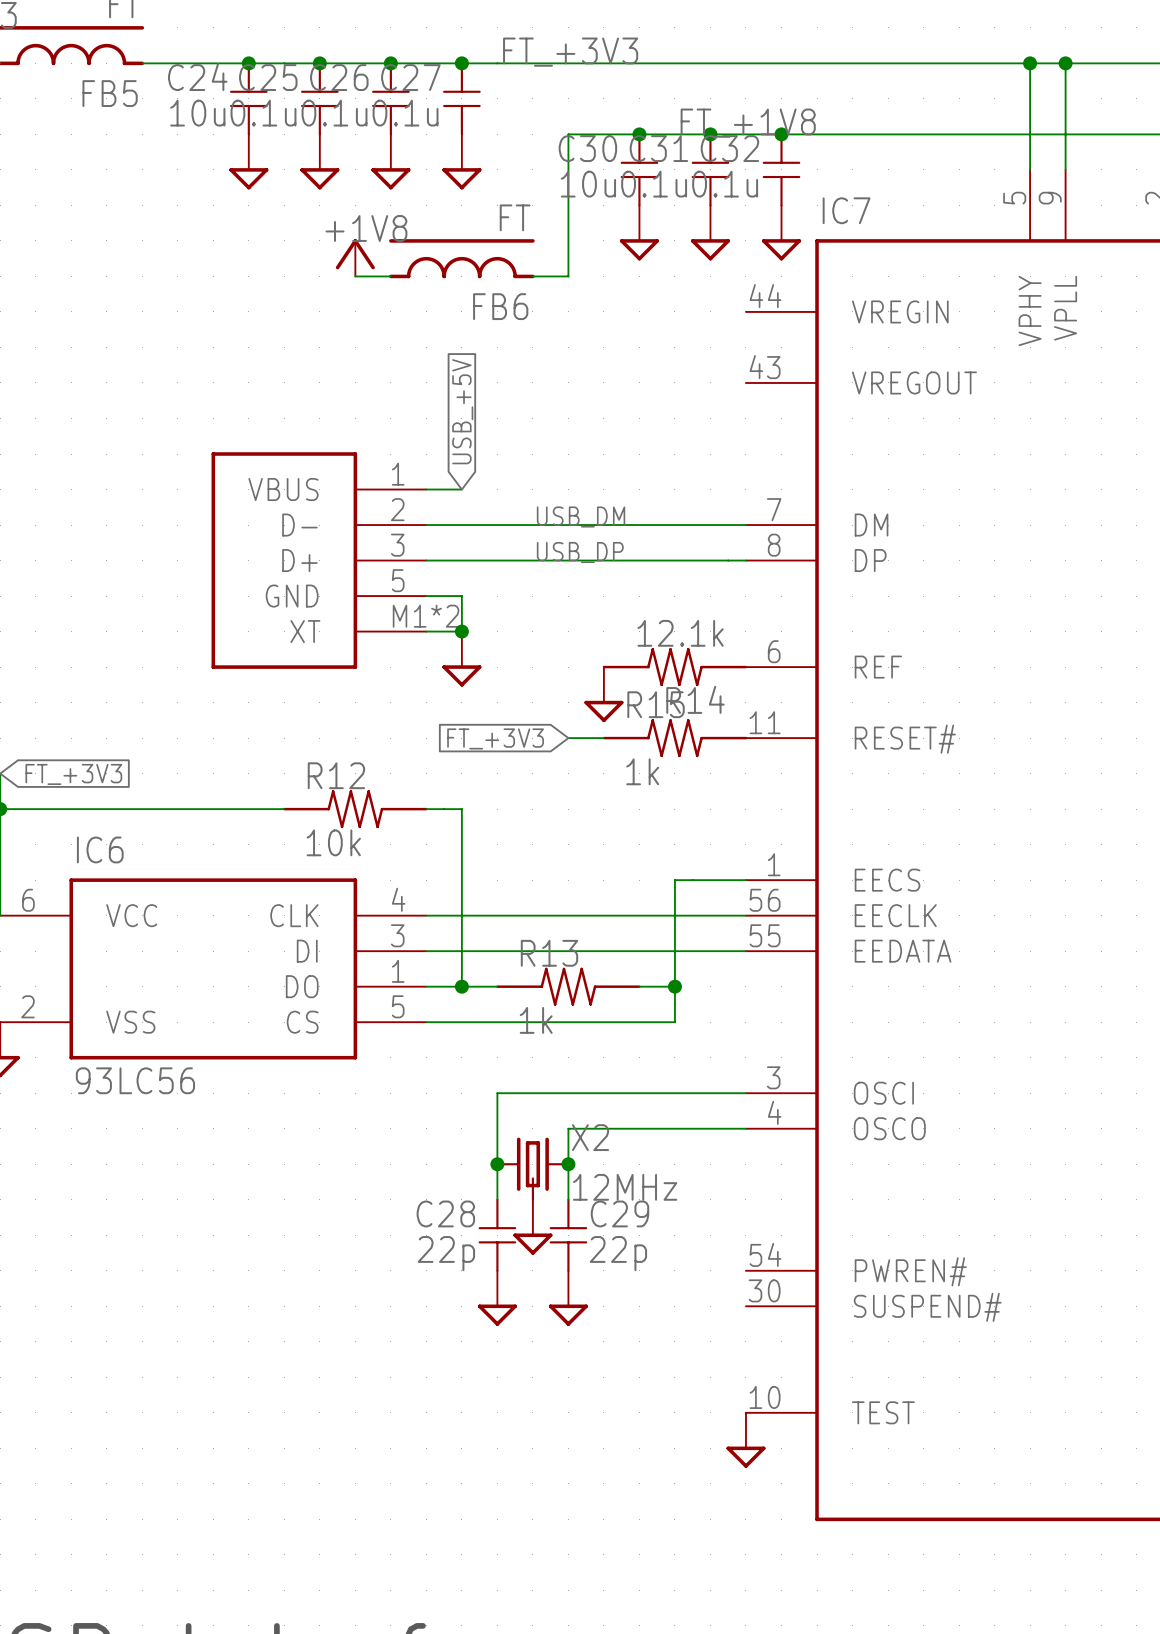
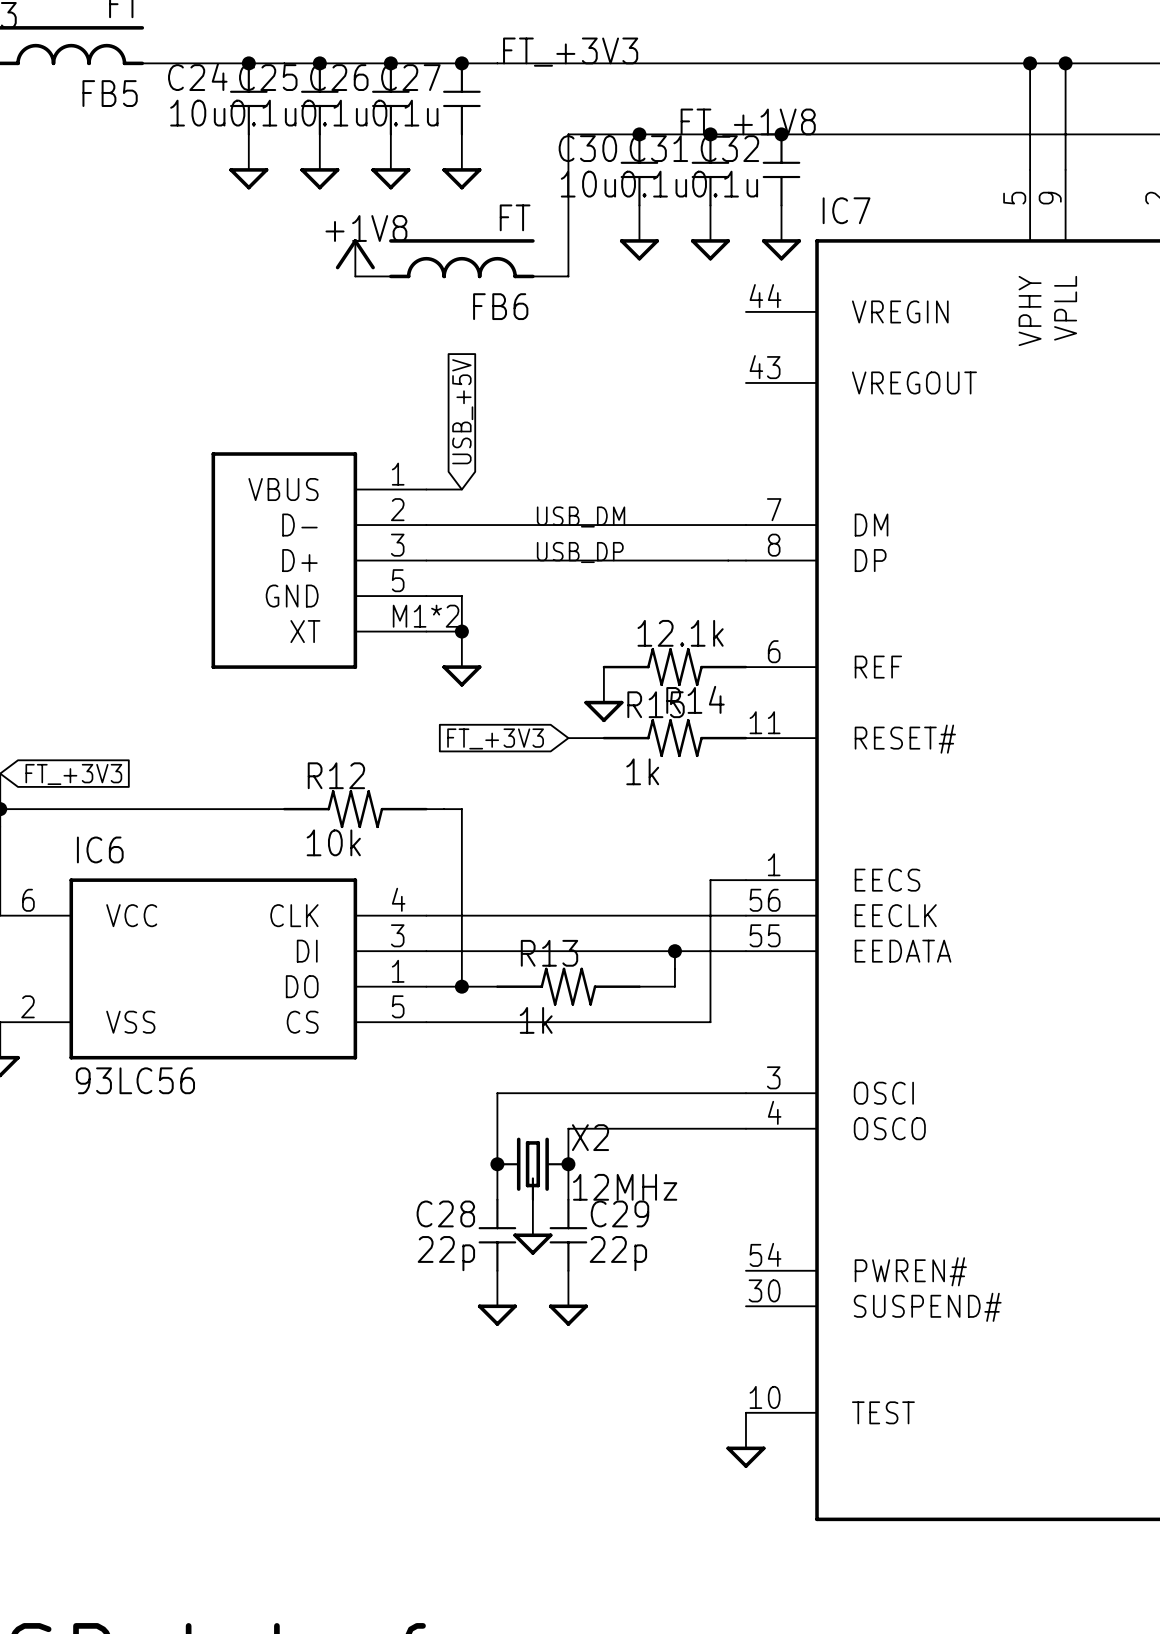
wire: (710, 880) (674, 880) (674, 951) -> (710, 880) (710, 1022) (674, 1022)
wire: (674, 986) (674, 1022) -> none
junction position: (674, 986) -> (674, 951)

